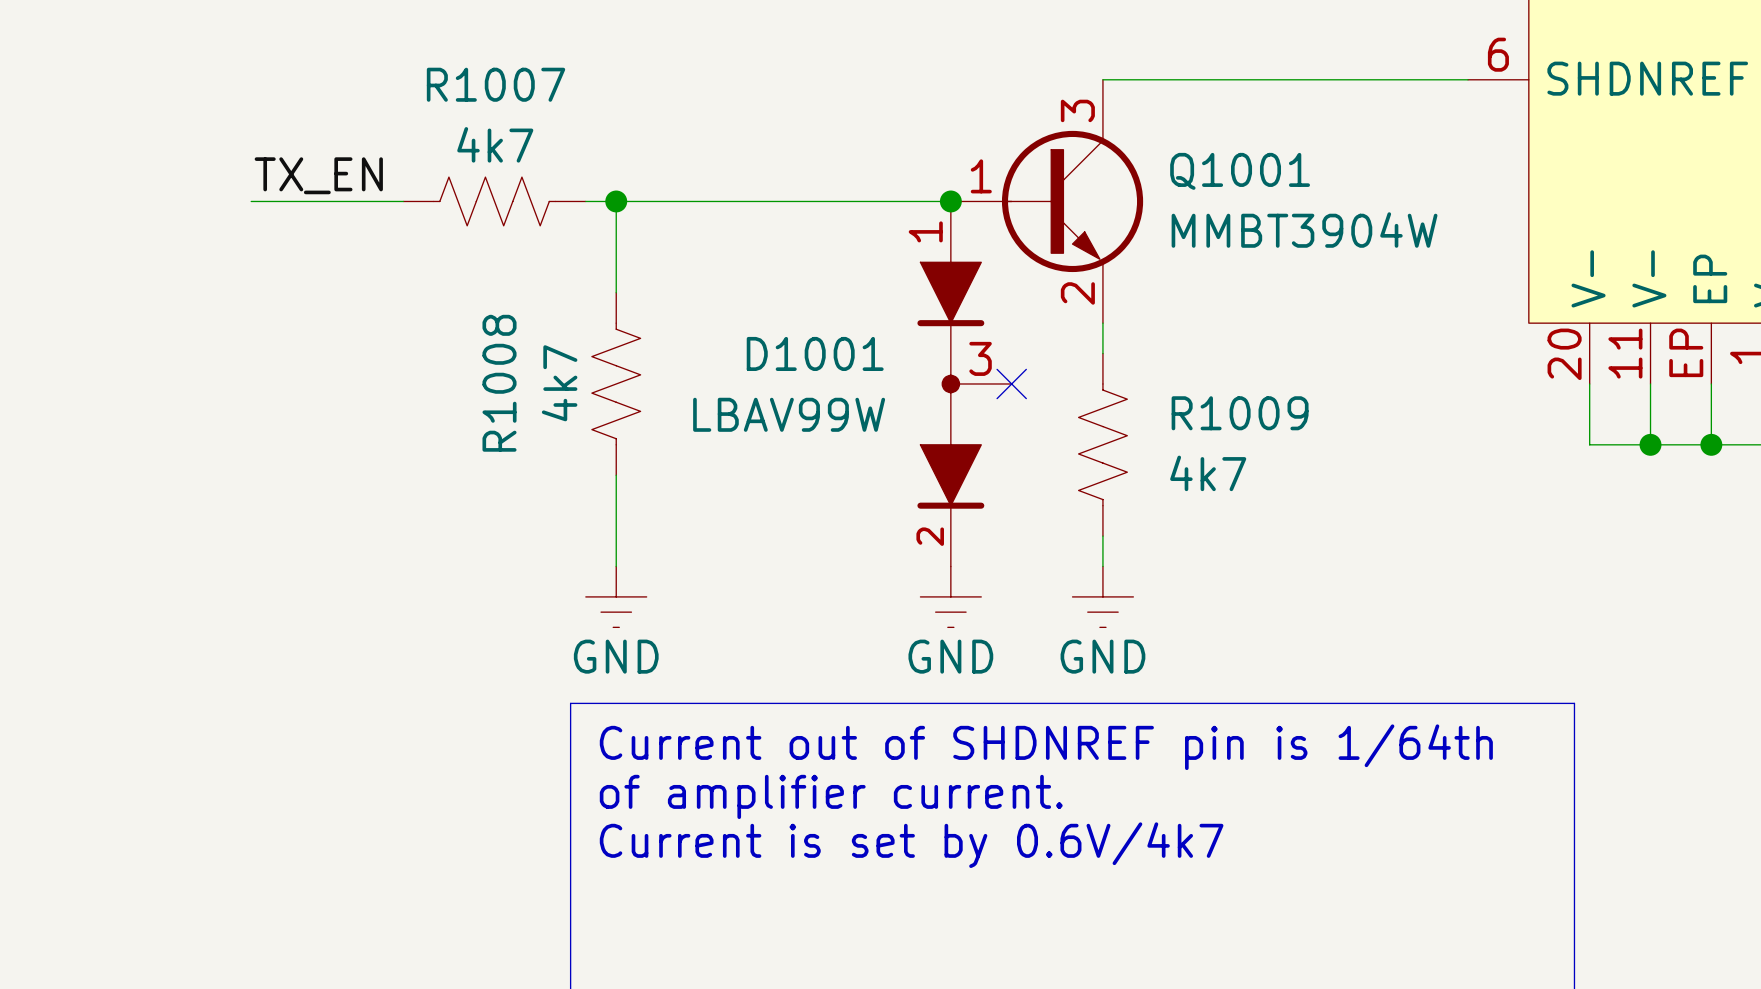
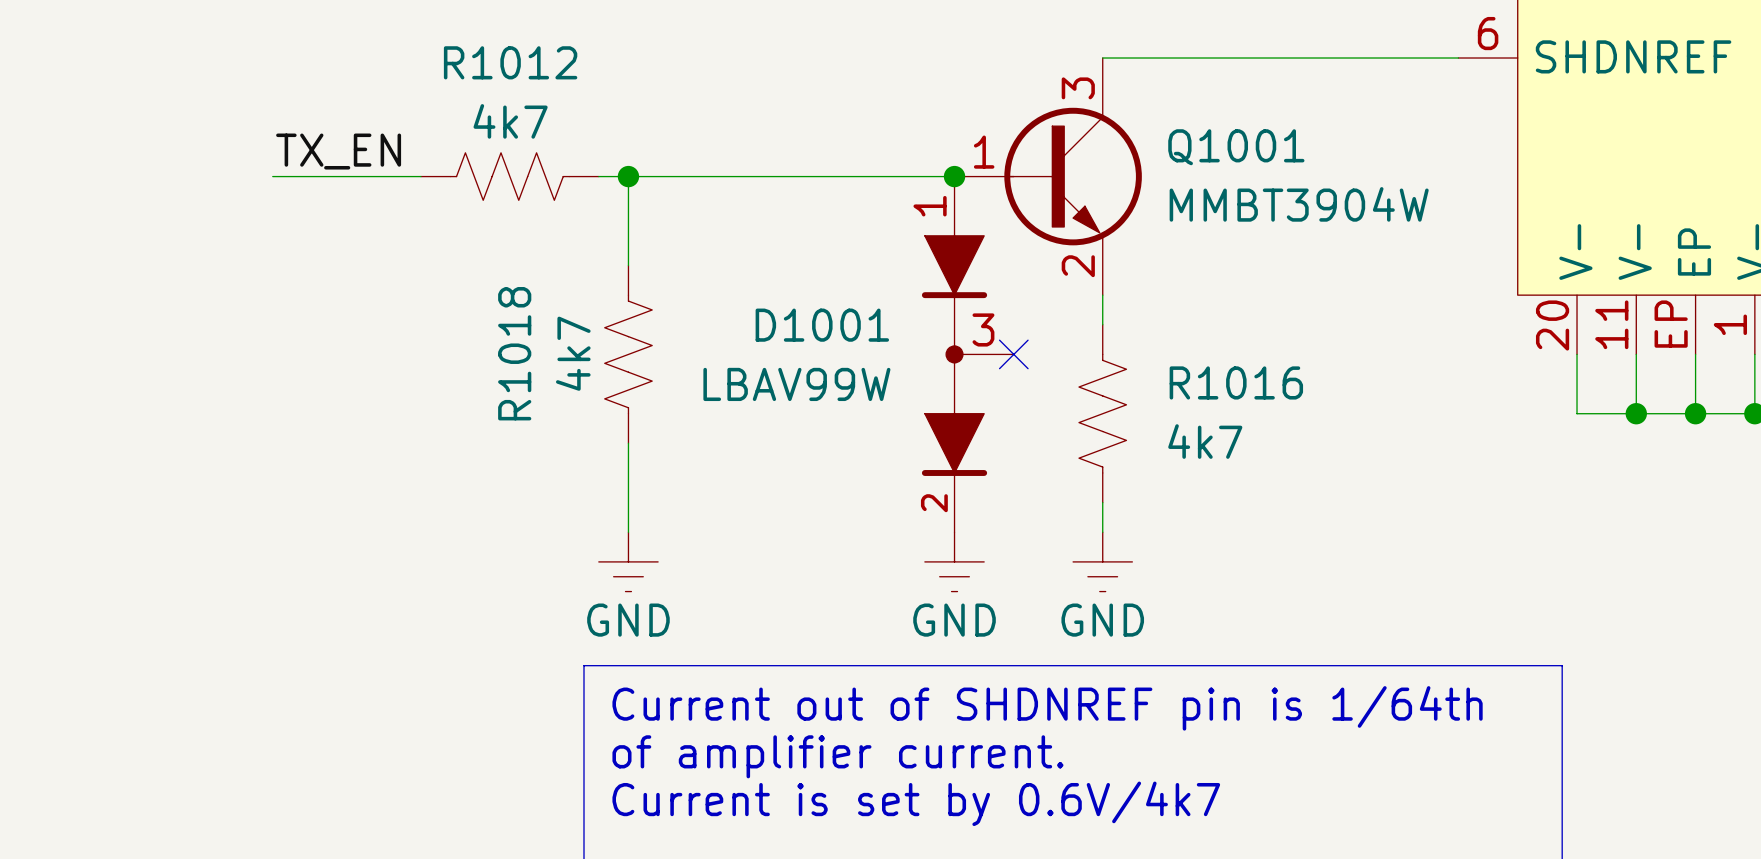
R1007 name: R1007 (496, 84) -> R1012 (510, 62)
R1008 name: R1008 (499, 383) -> R1018 (514, 353)
R1009 name: R1009 (1240, 413) -> R1016 (1236, 382)

